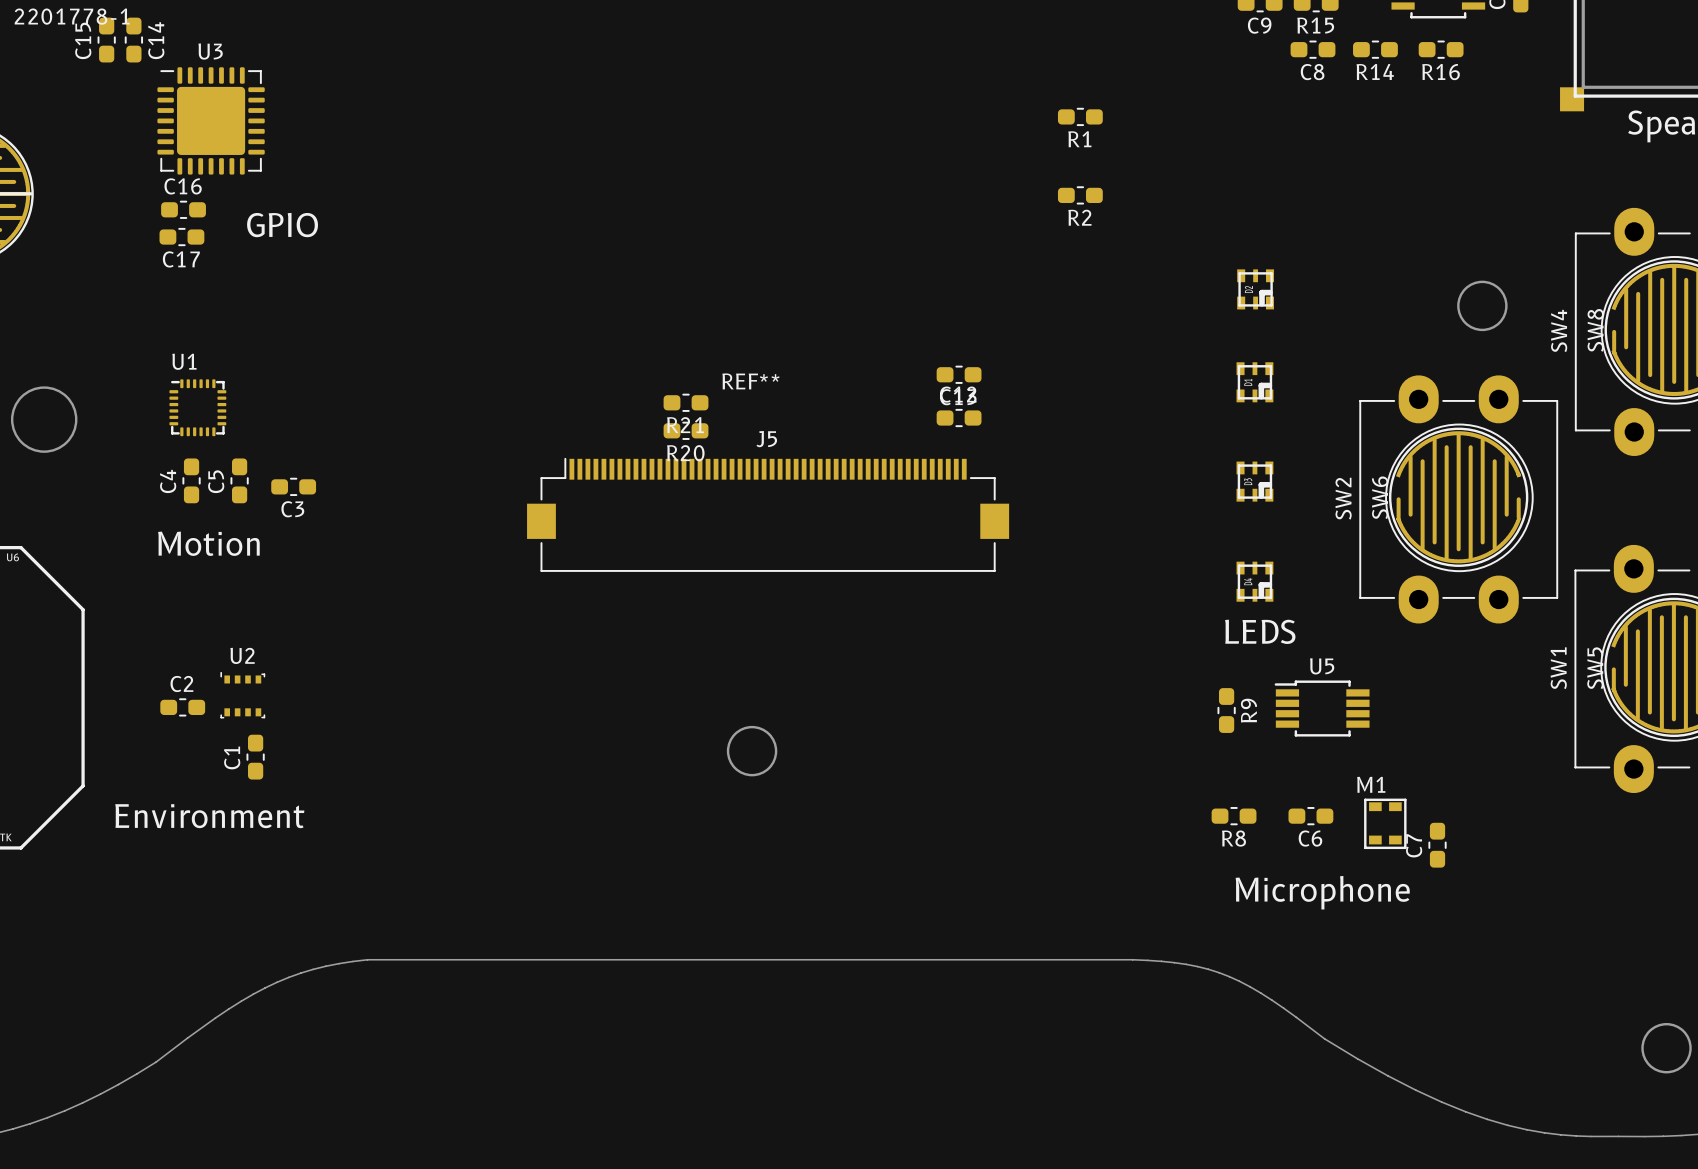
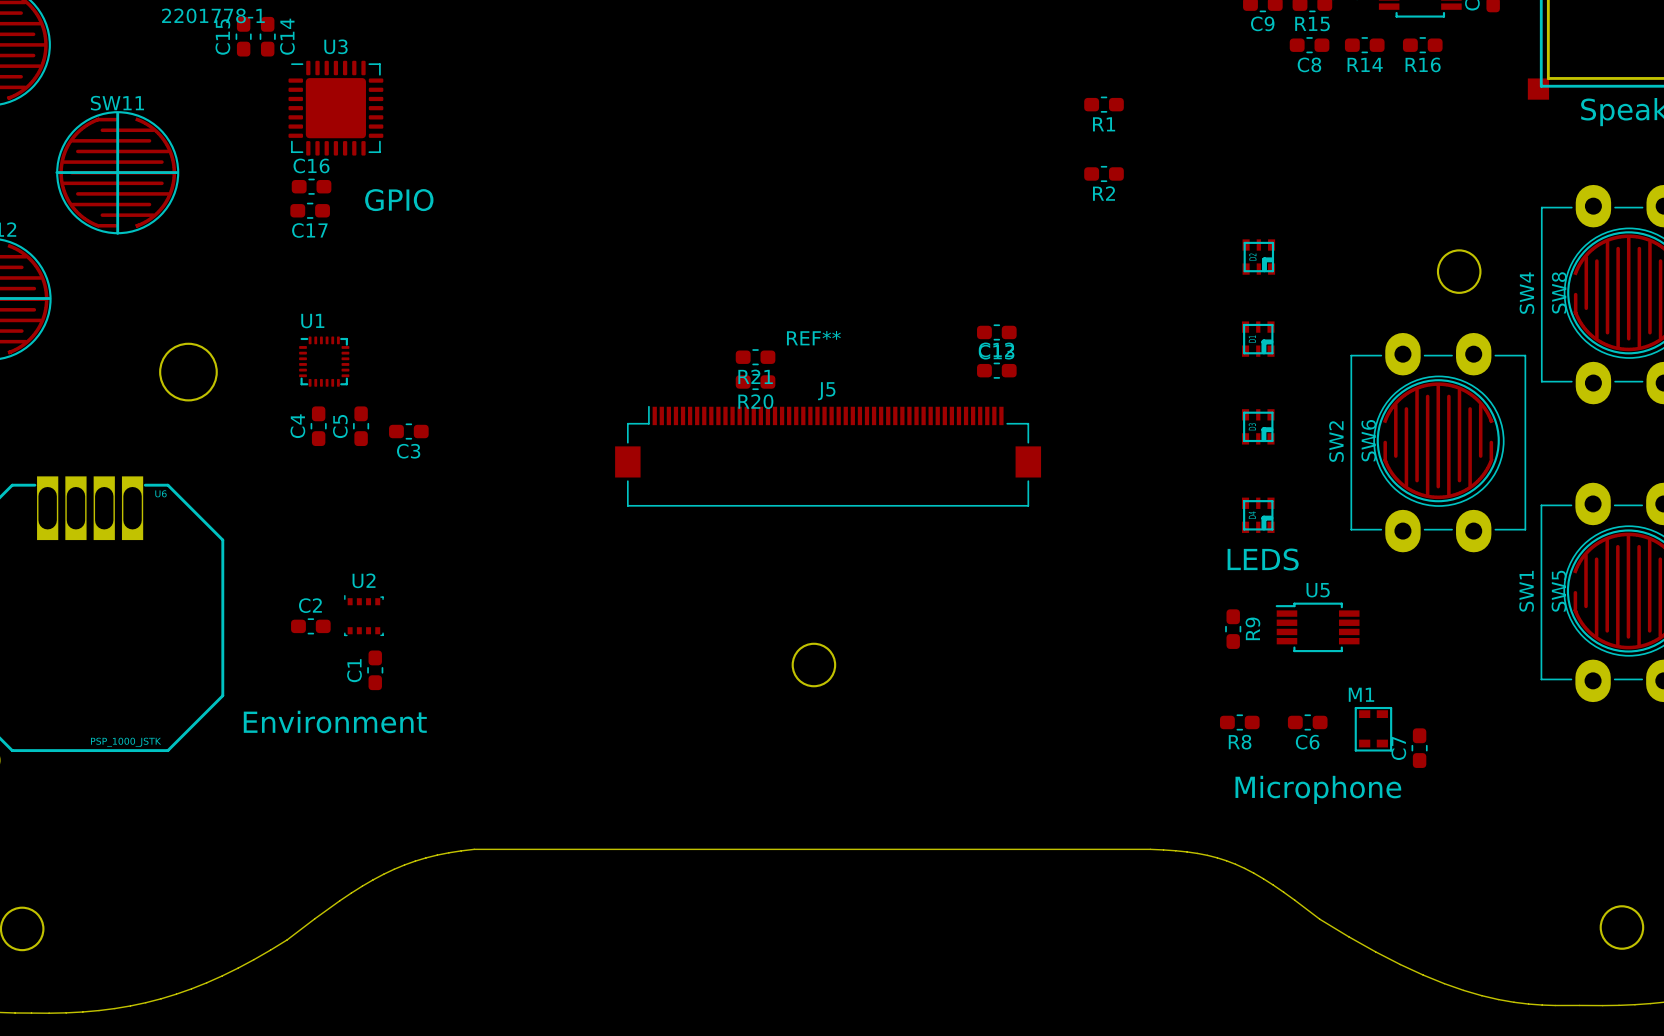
text: Motion (208, 543) -> none

